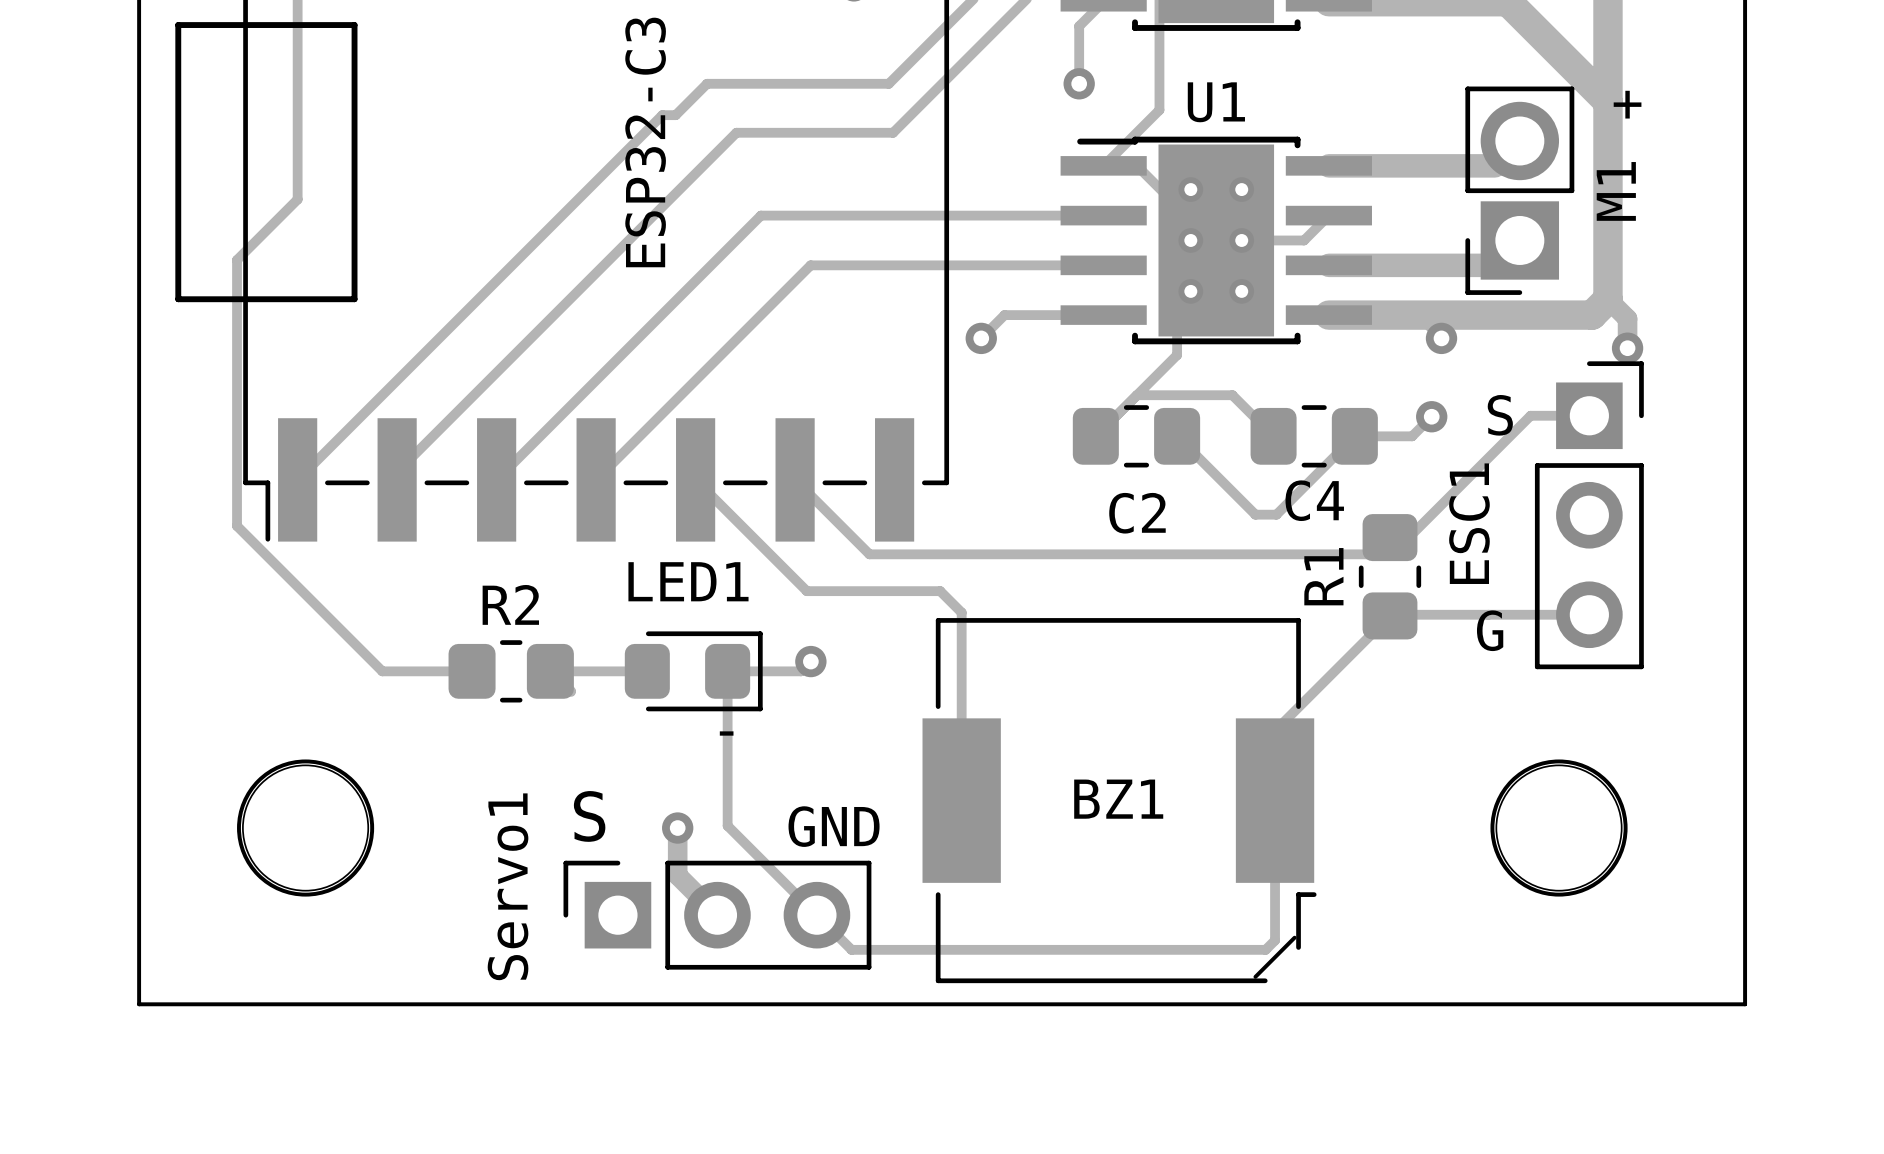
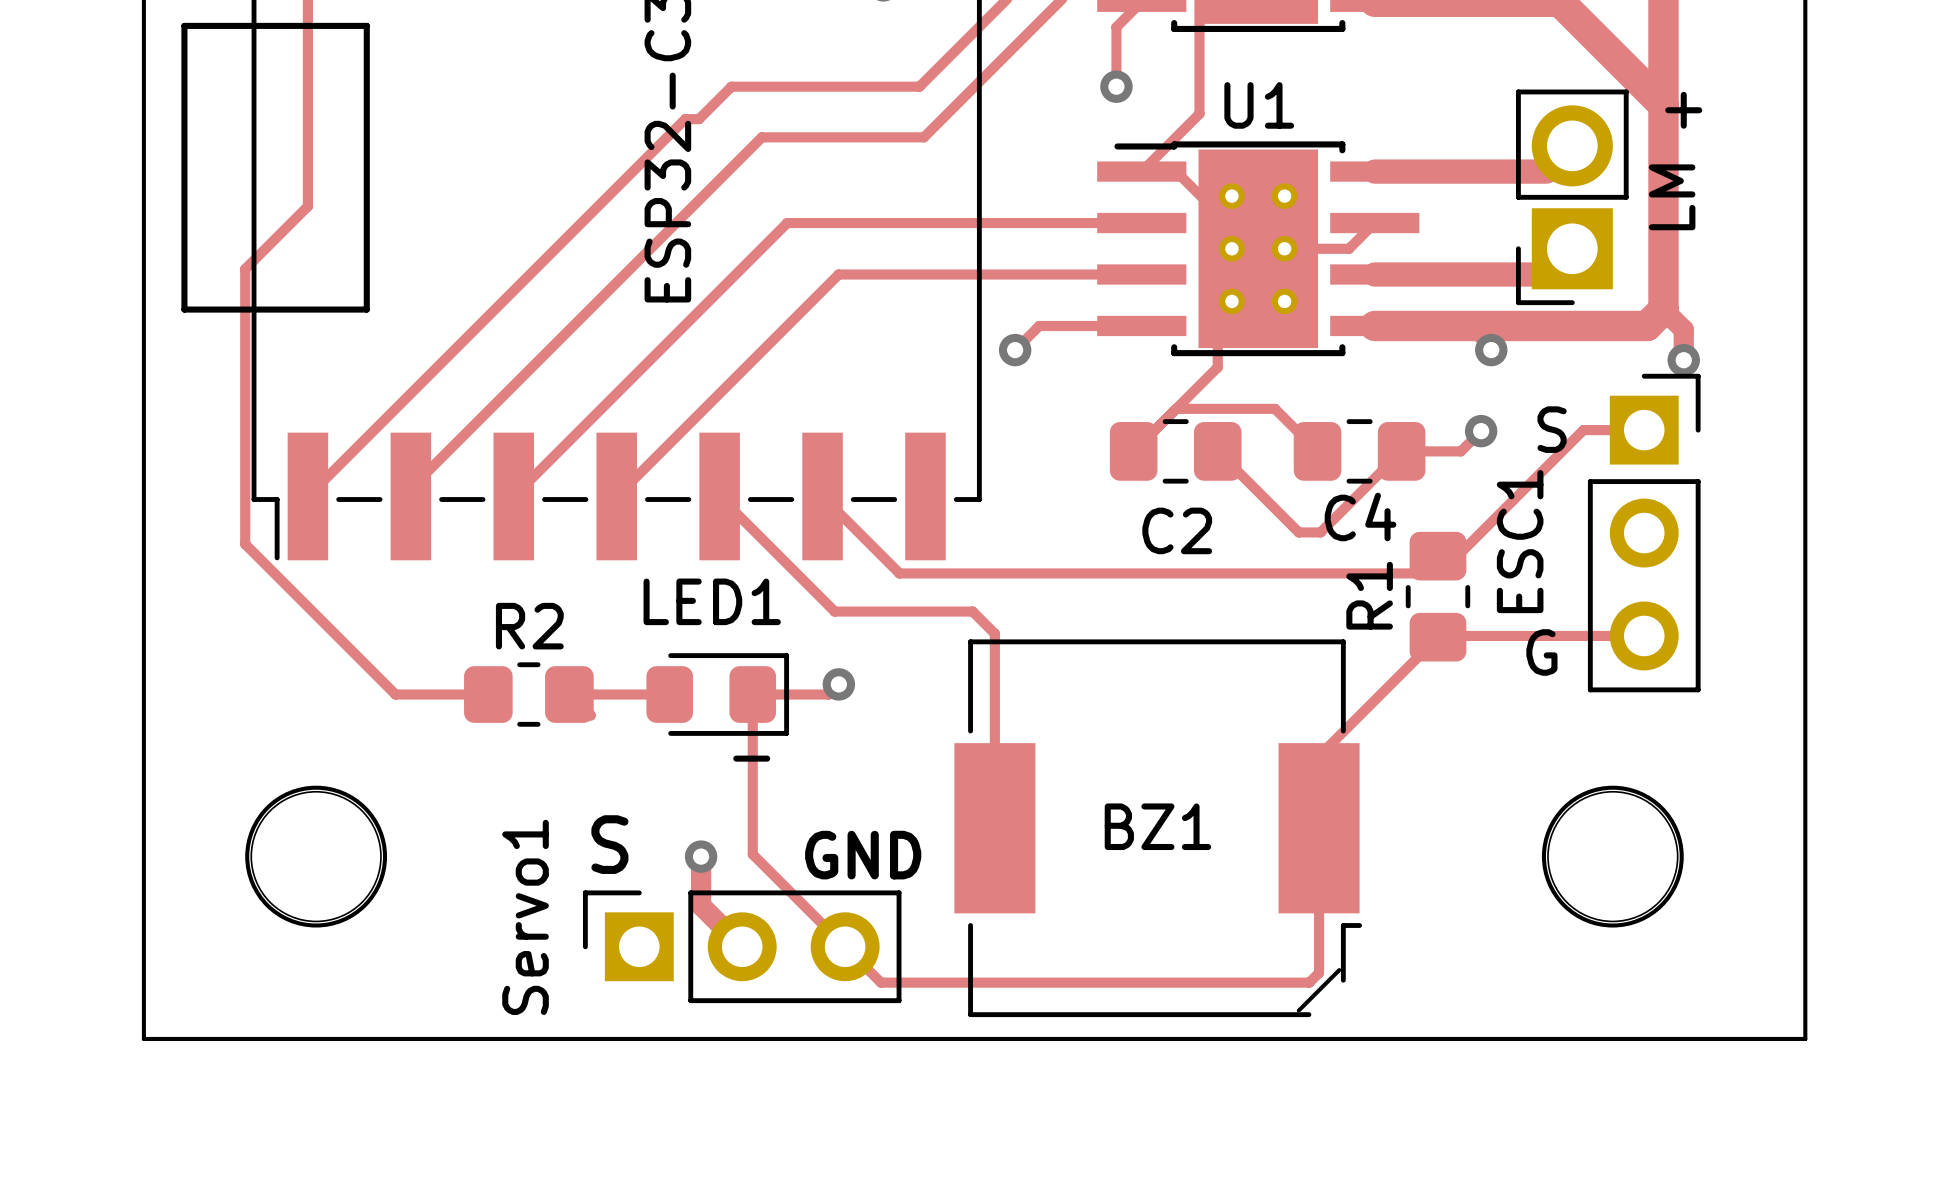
M1 name: M1 (1616, 191) -> LM (1672, 197)

